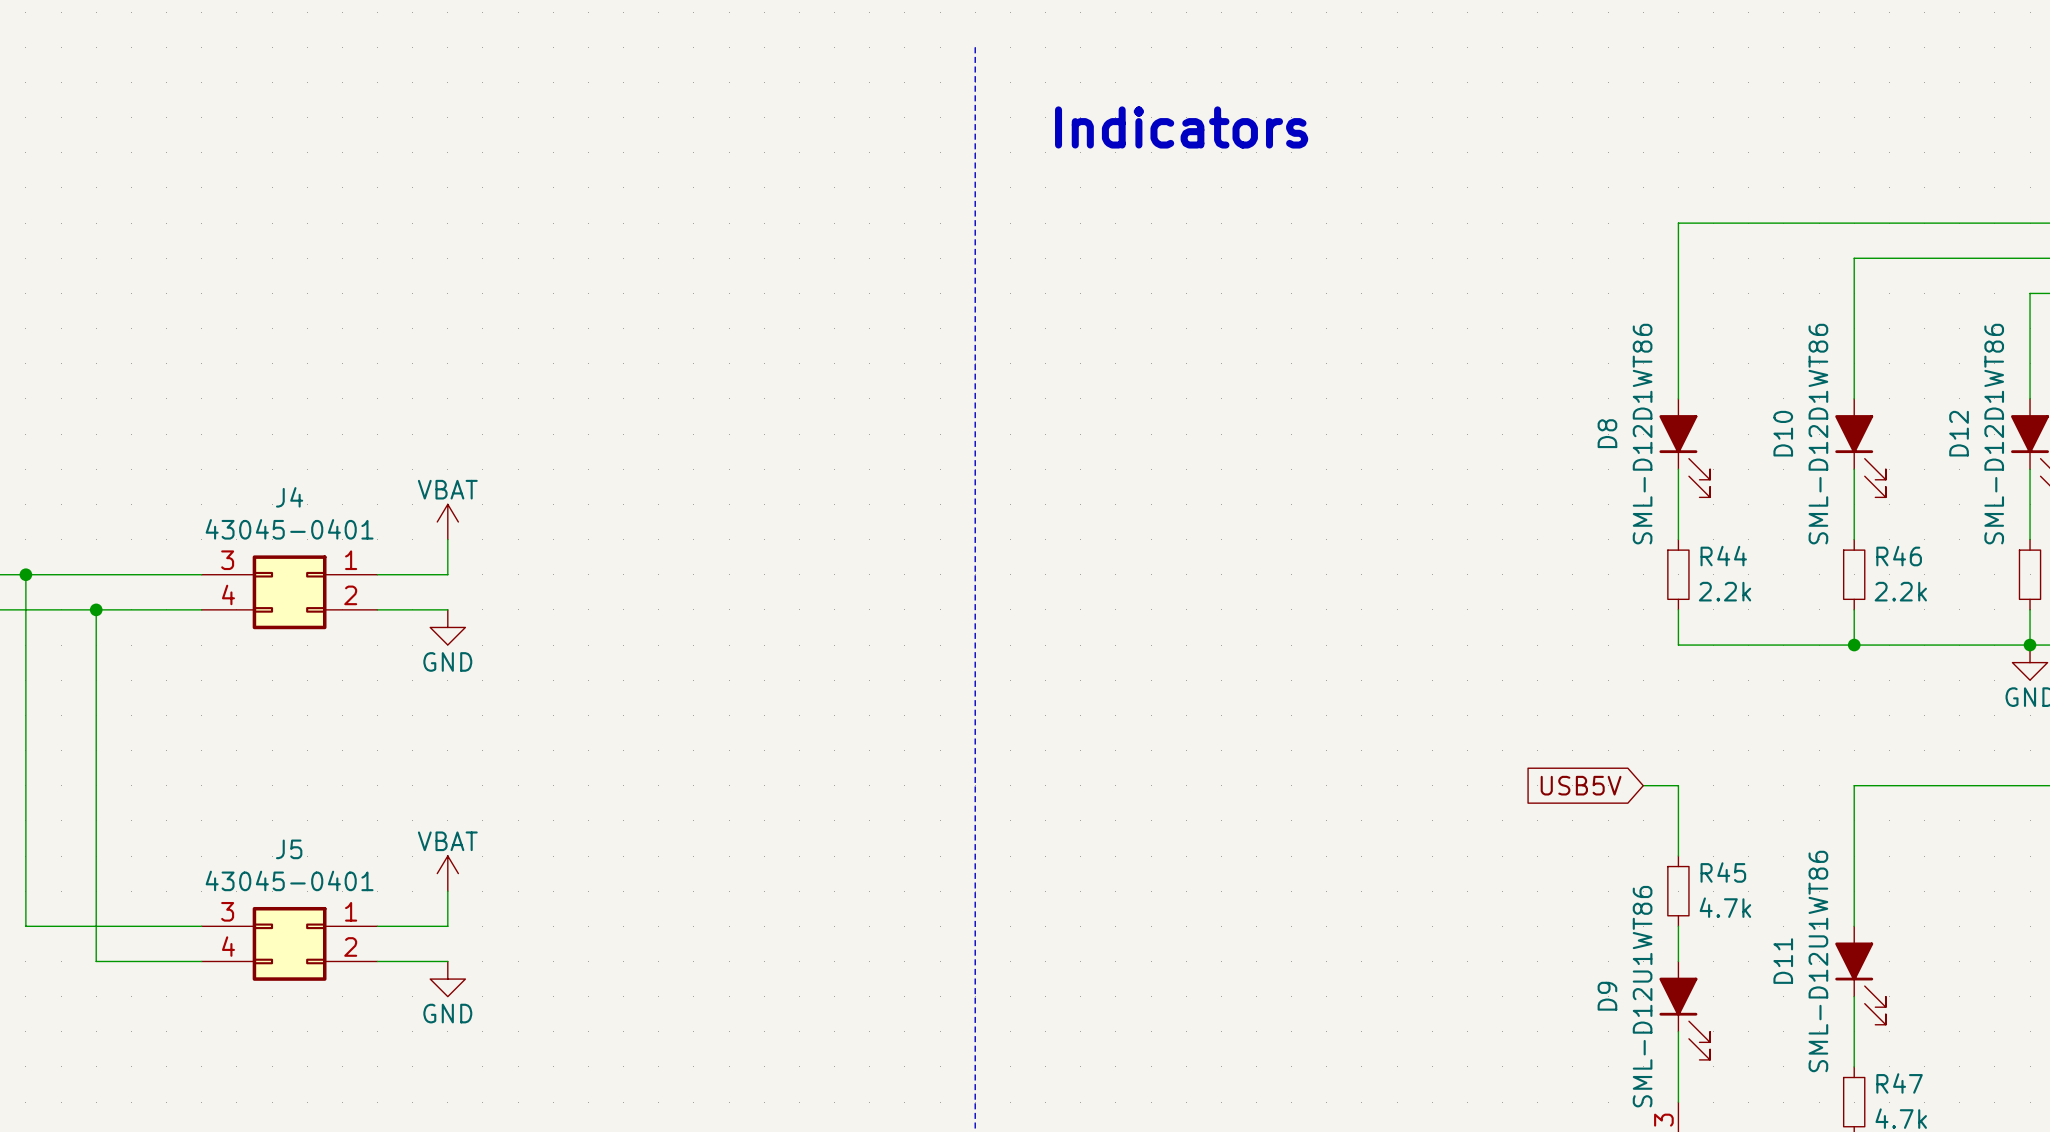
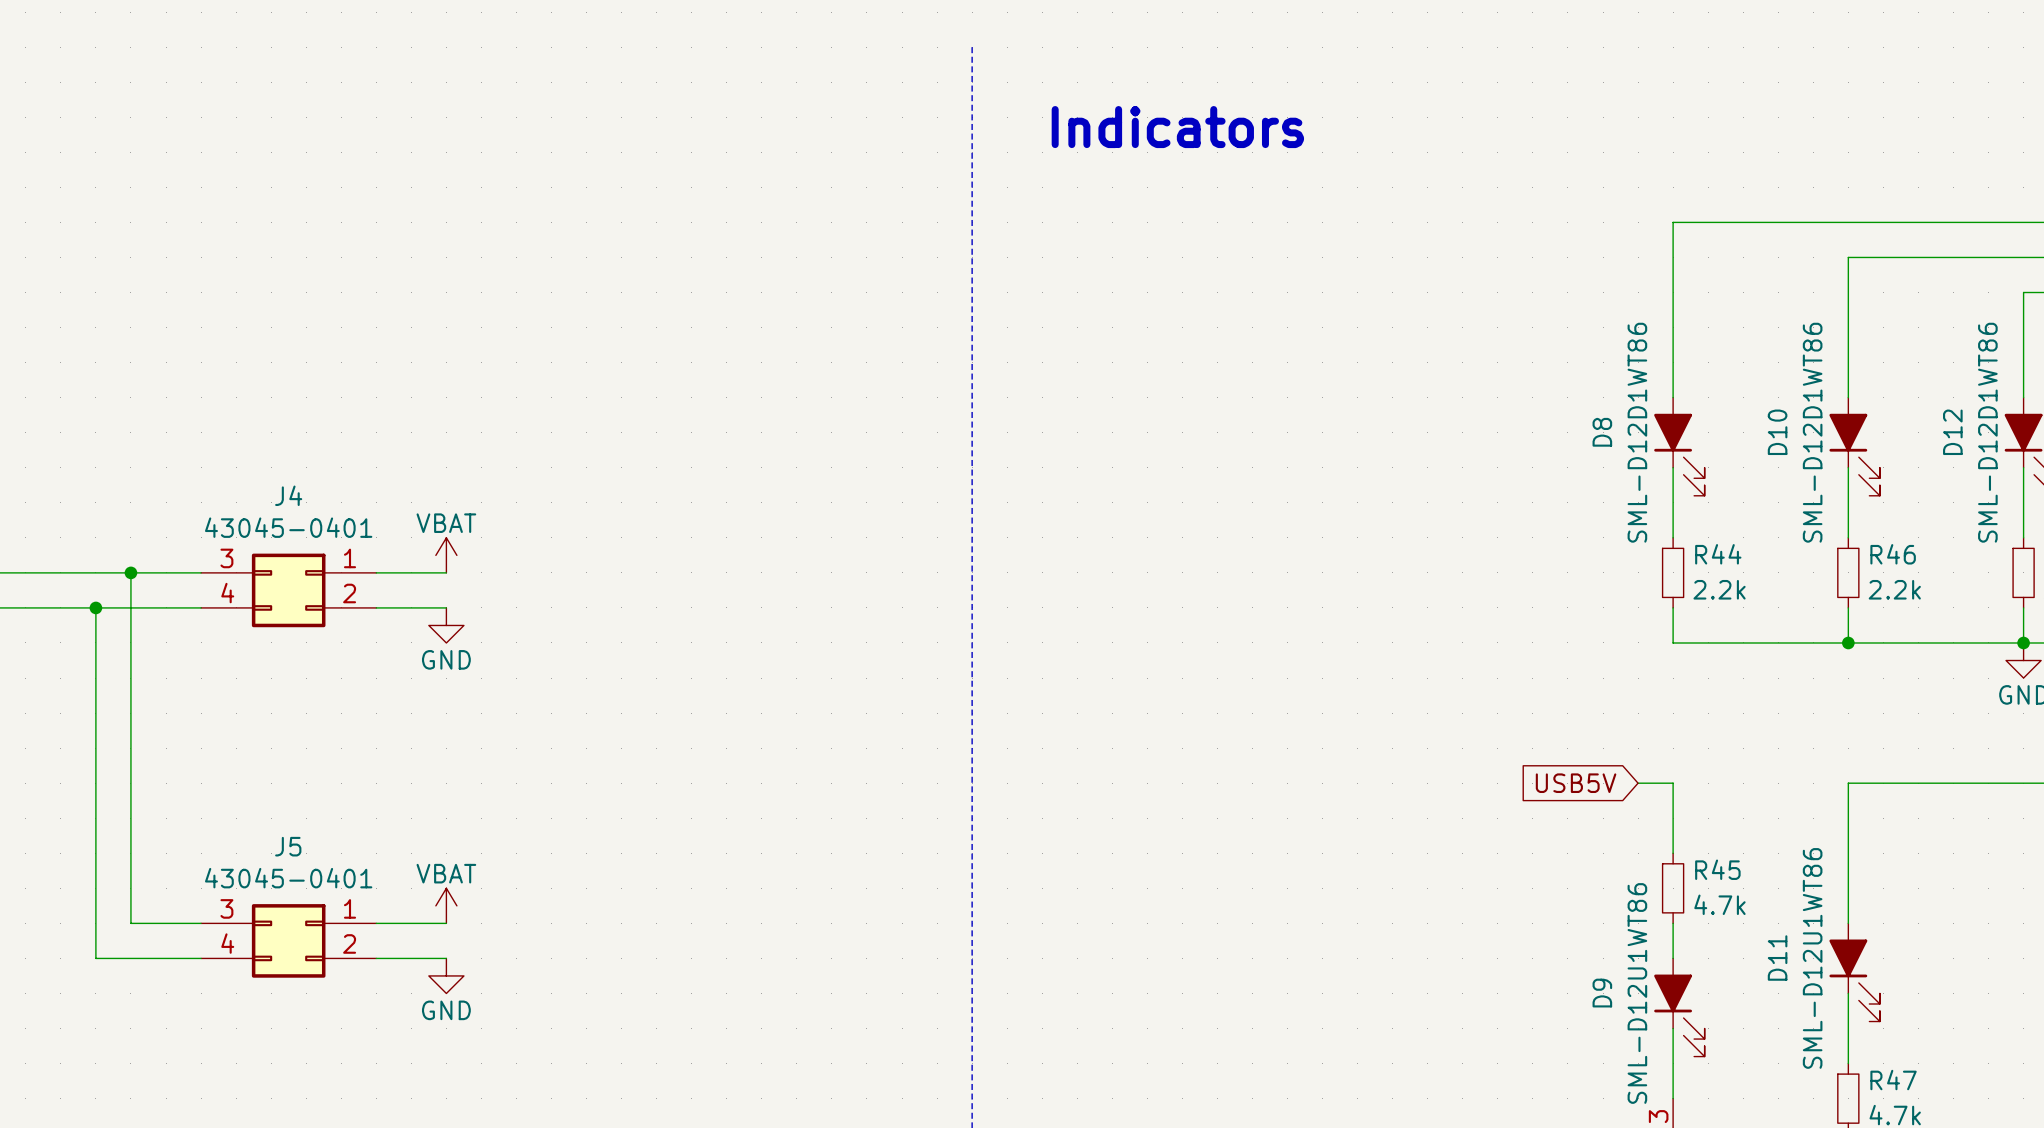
power symbol position: VBAT (447, 521) -> VBAT (446, 555)
wire: (25, 574) (25, 926) (131, 926) -> (130, 572) (130, 923)
junction: (25, 574) -> none
junction: none -> (130, 572)
power symbol position: VBAT (447, 873) -> VBAT (446, 905)

